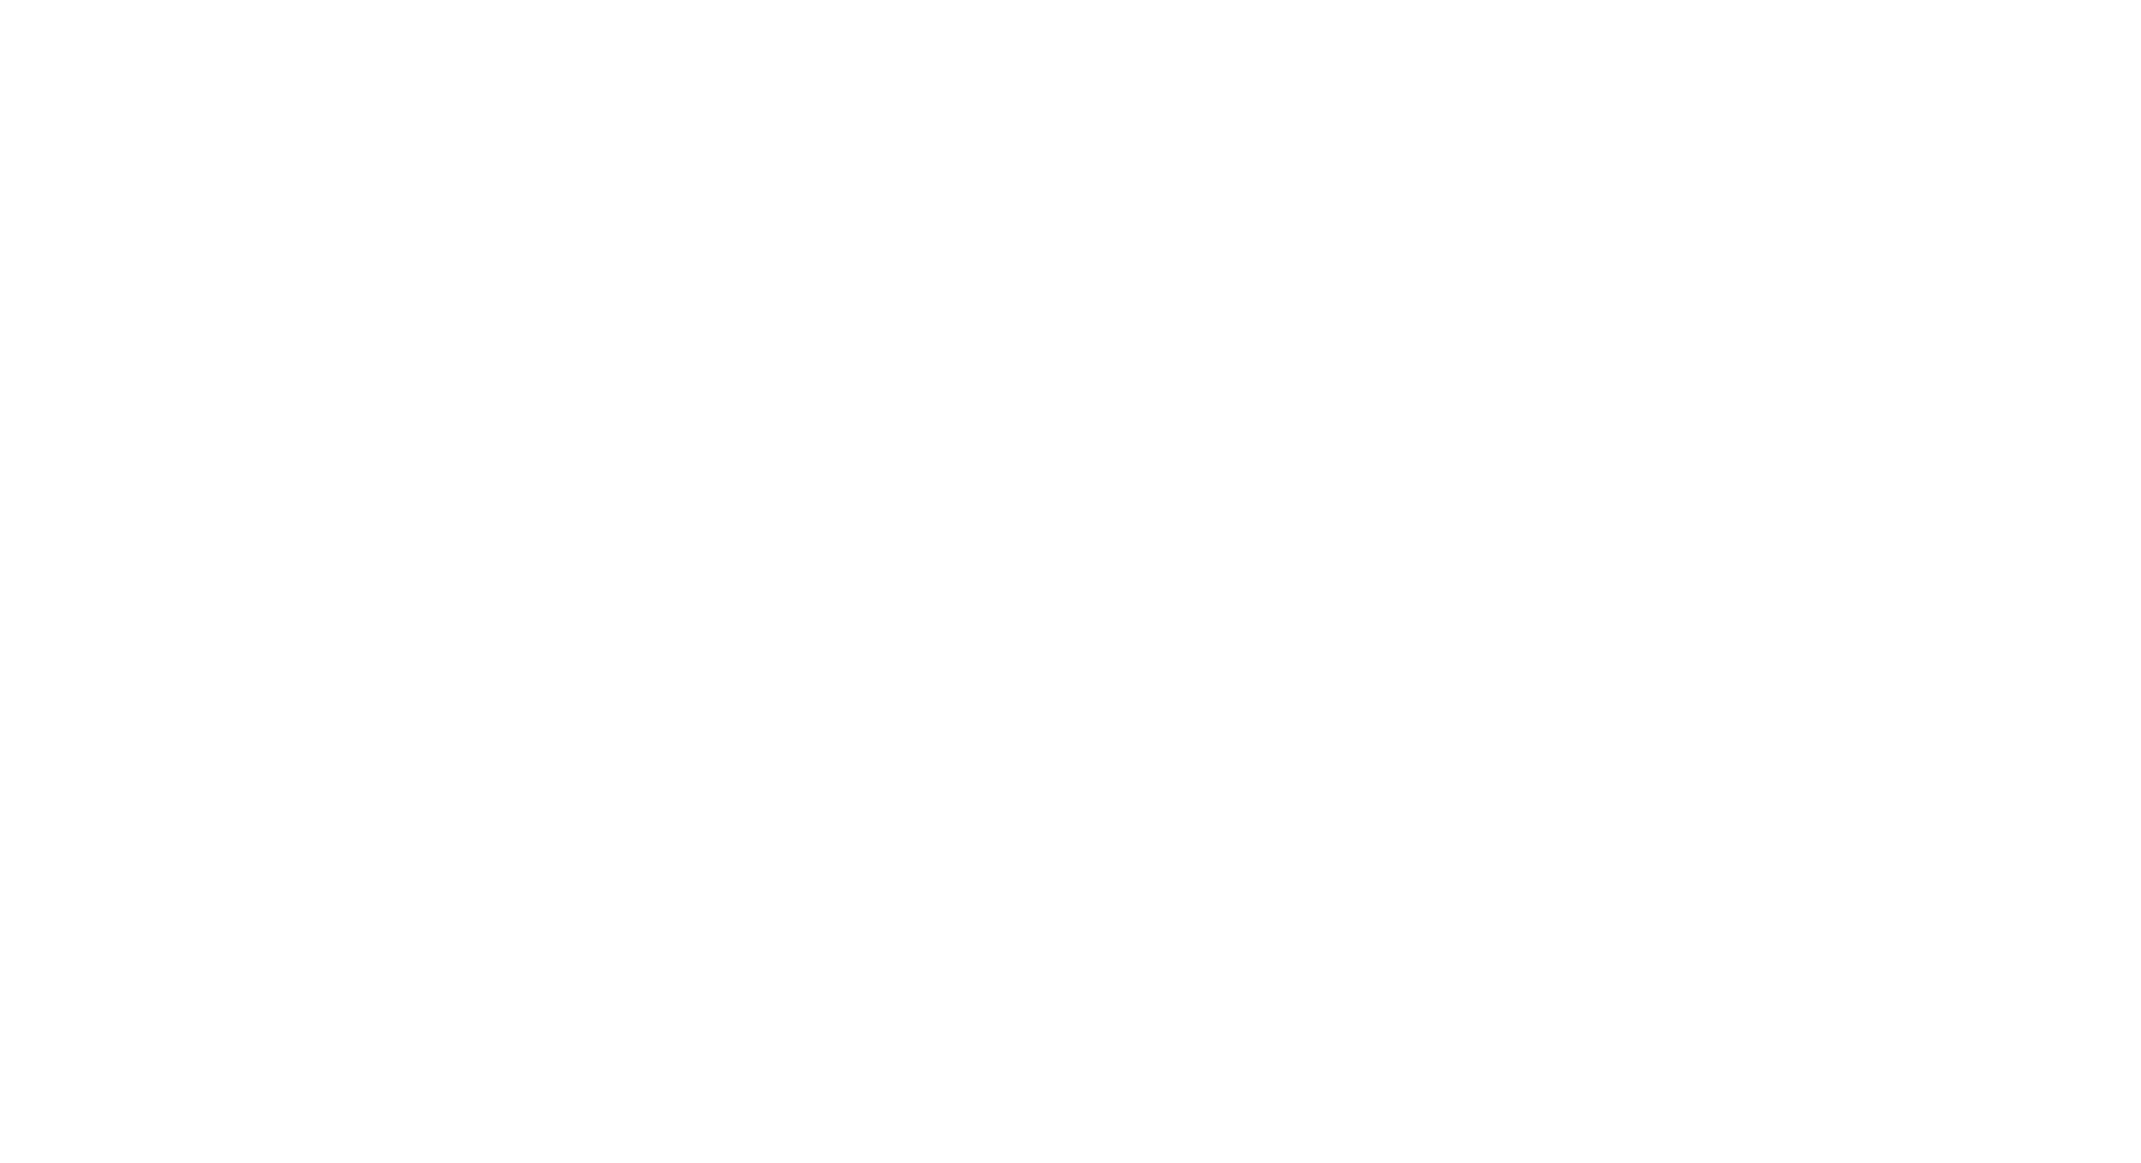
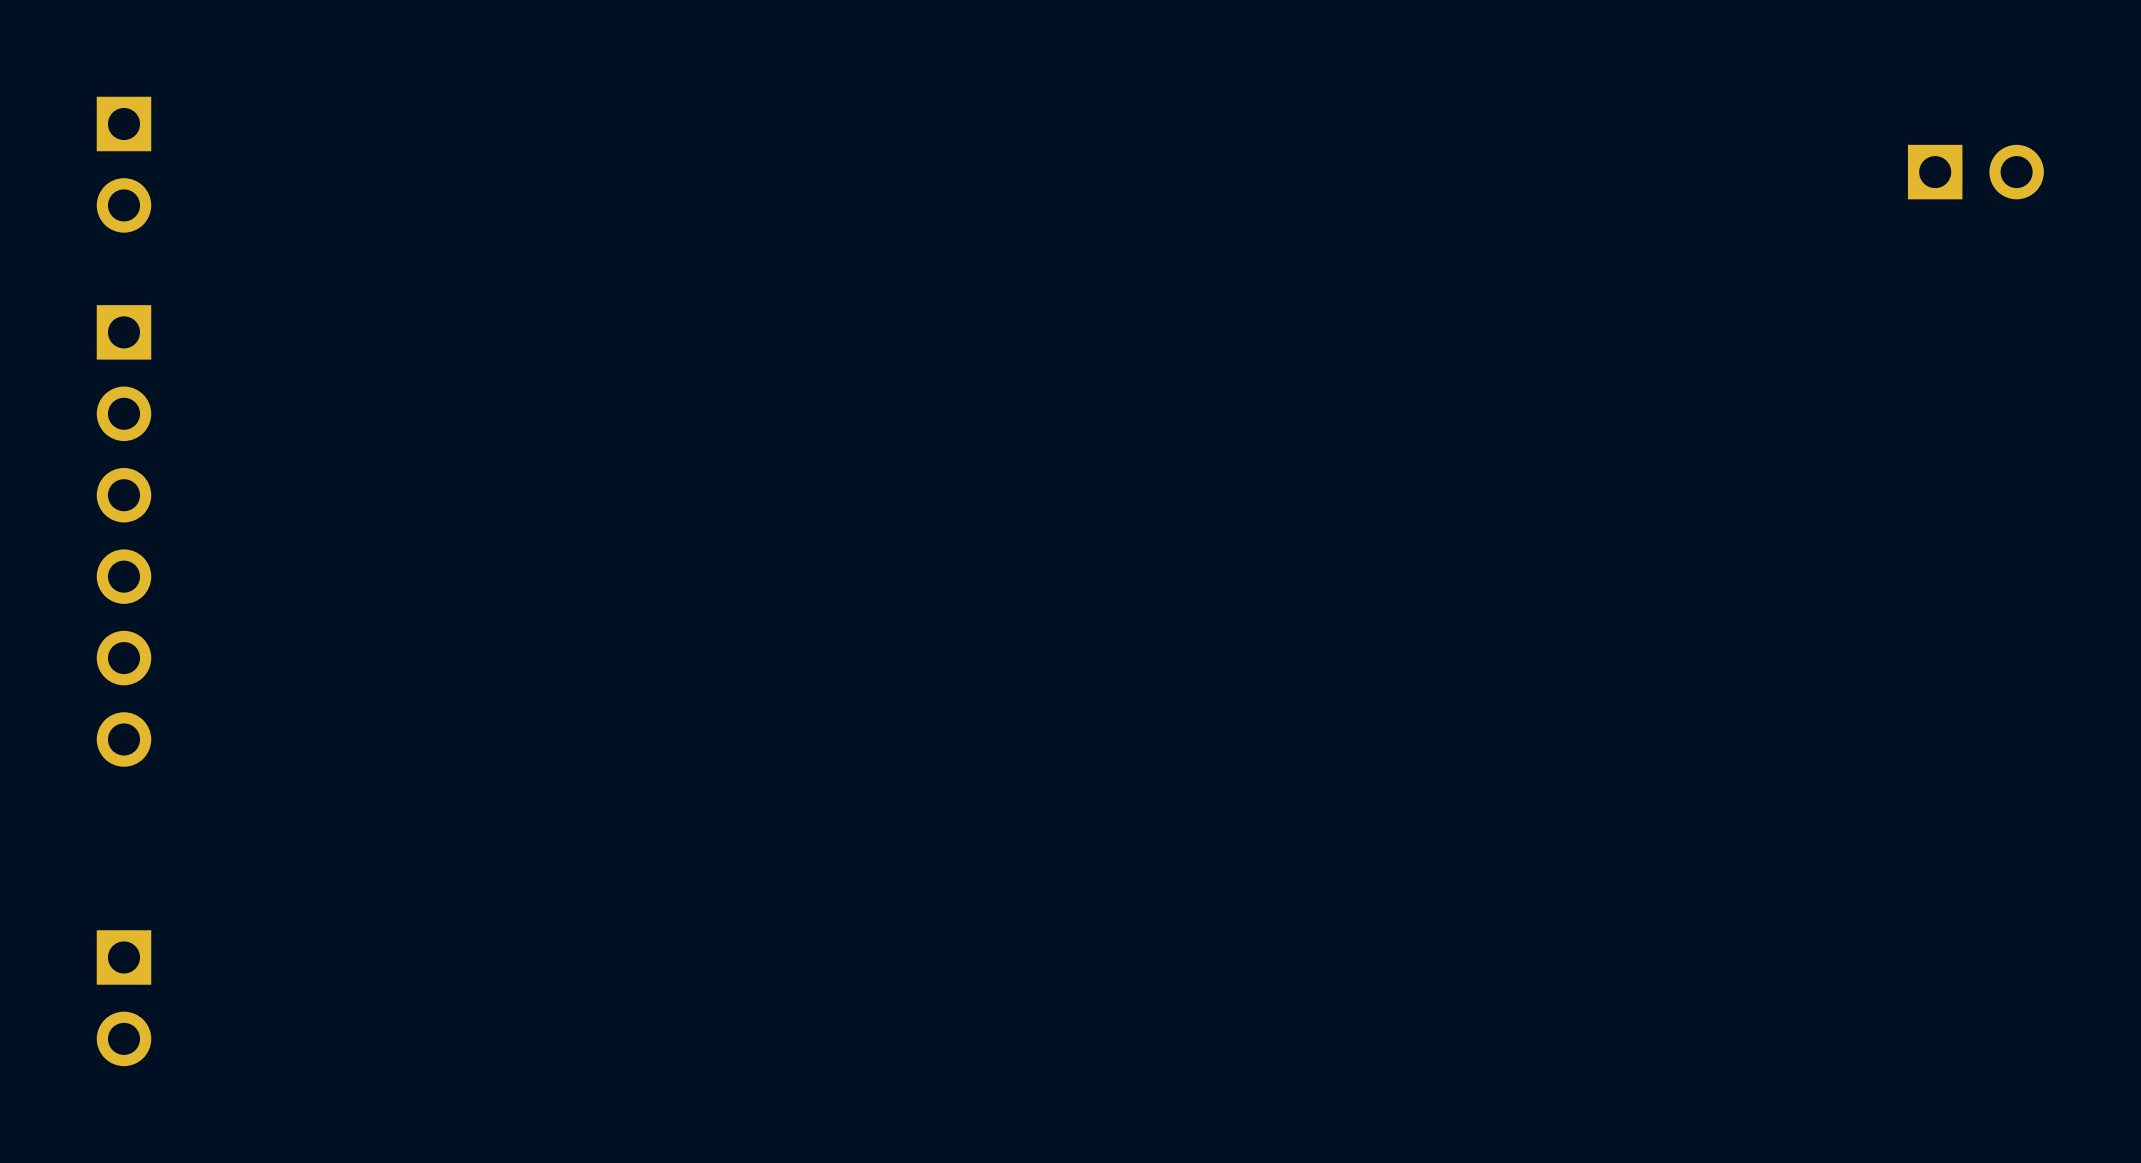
part: none -> (124, 164)
part: none -> (1975, 172)
part: none -> (124, 535)
part: none -> (124, 998)

